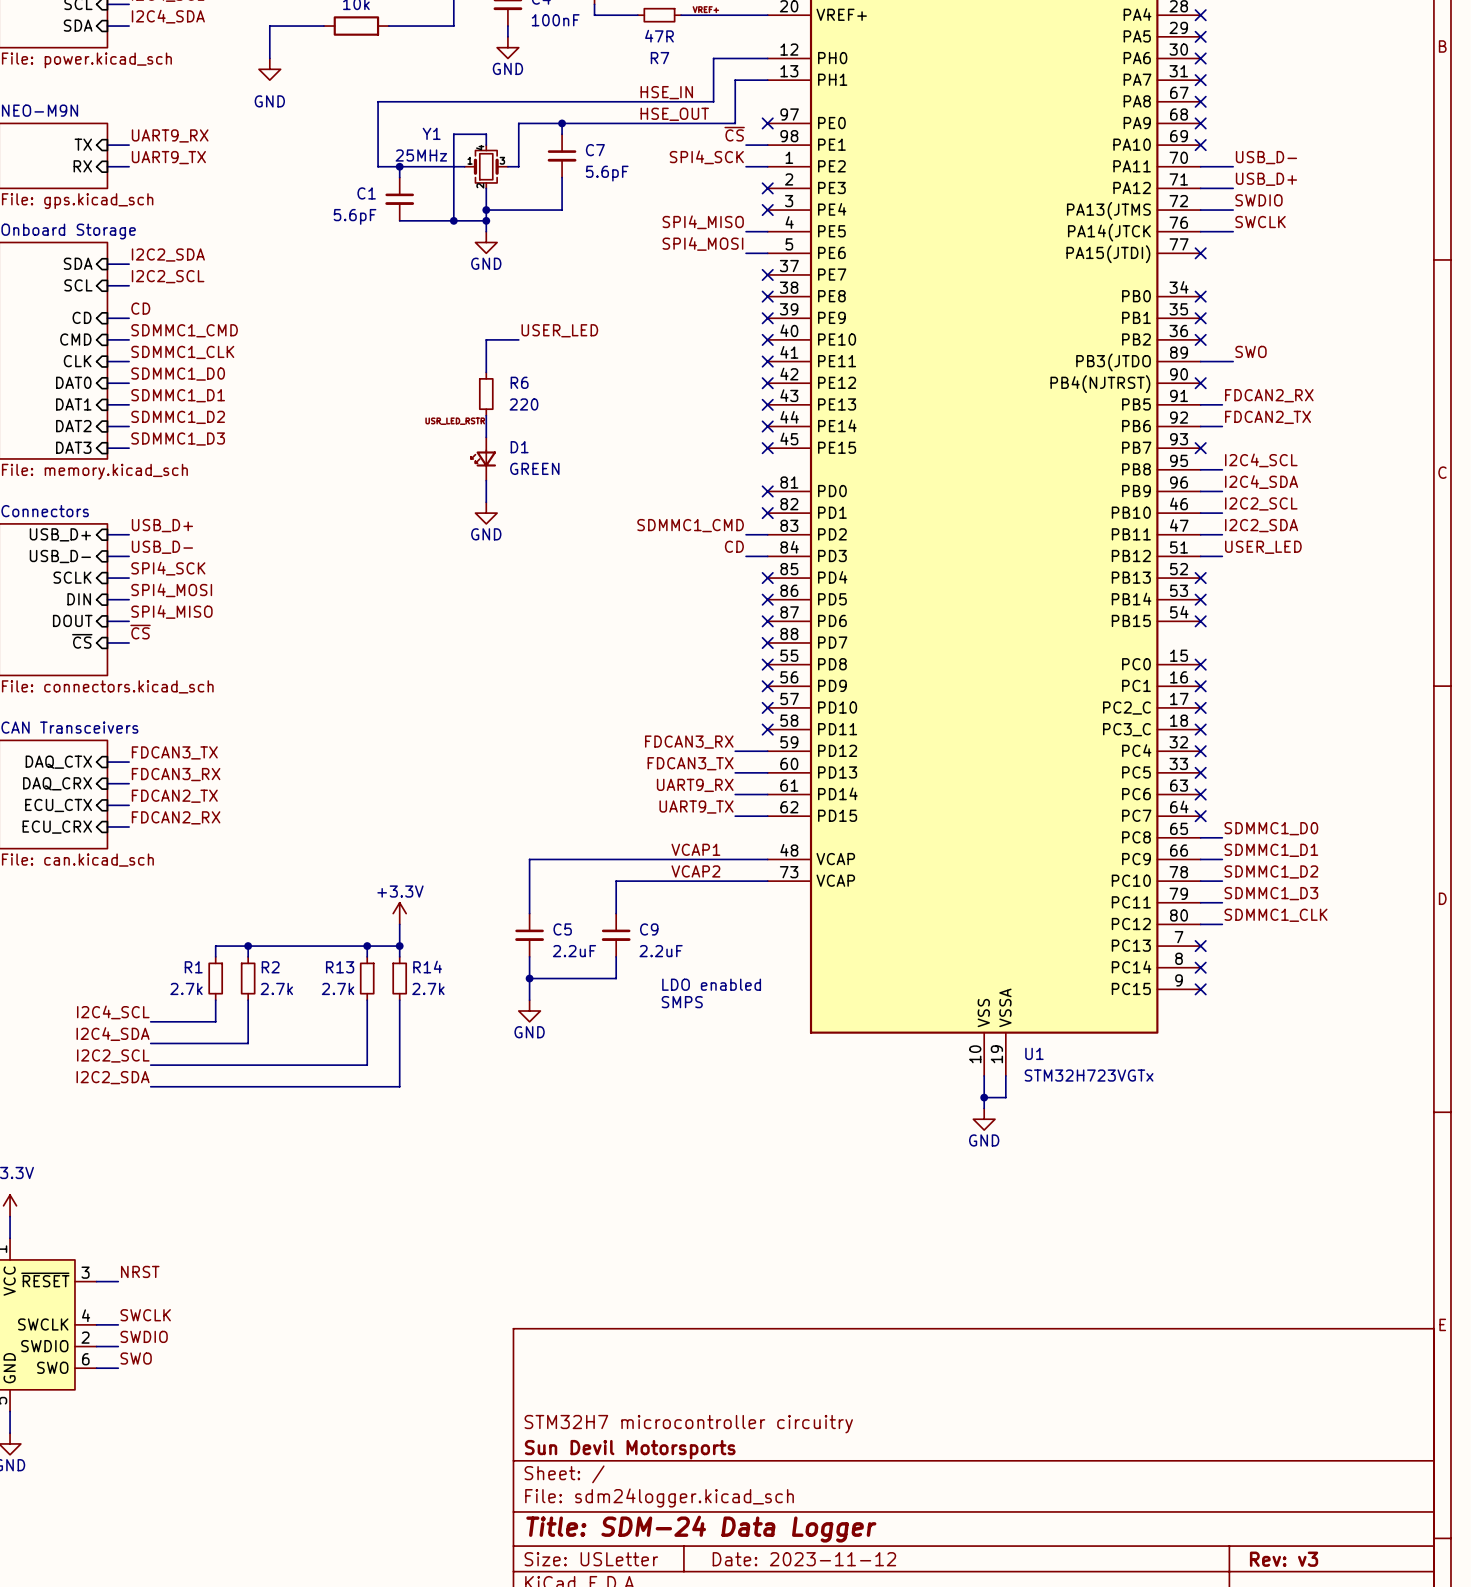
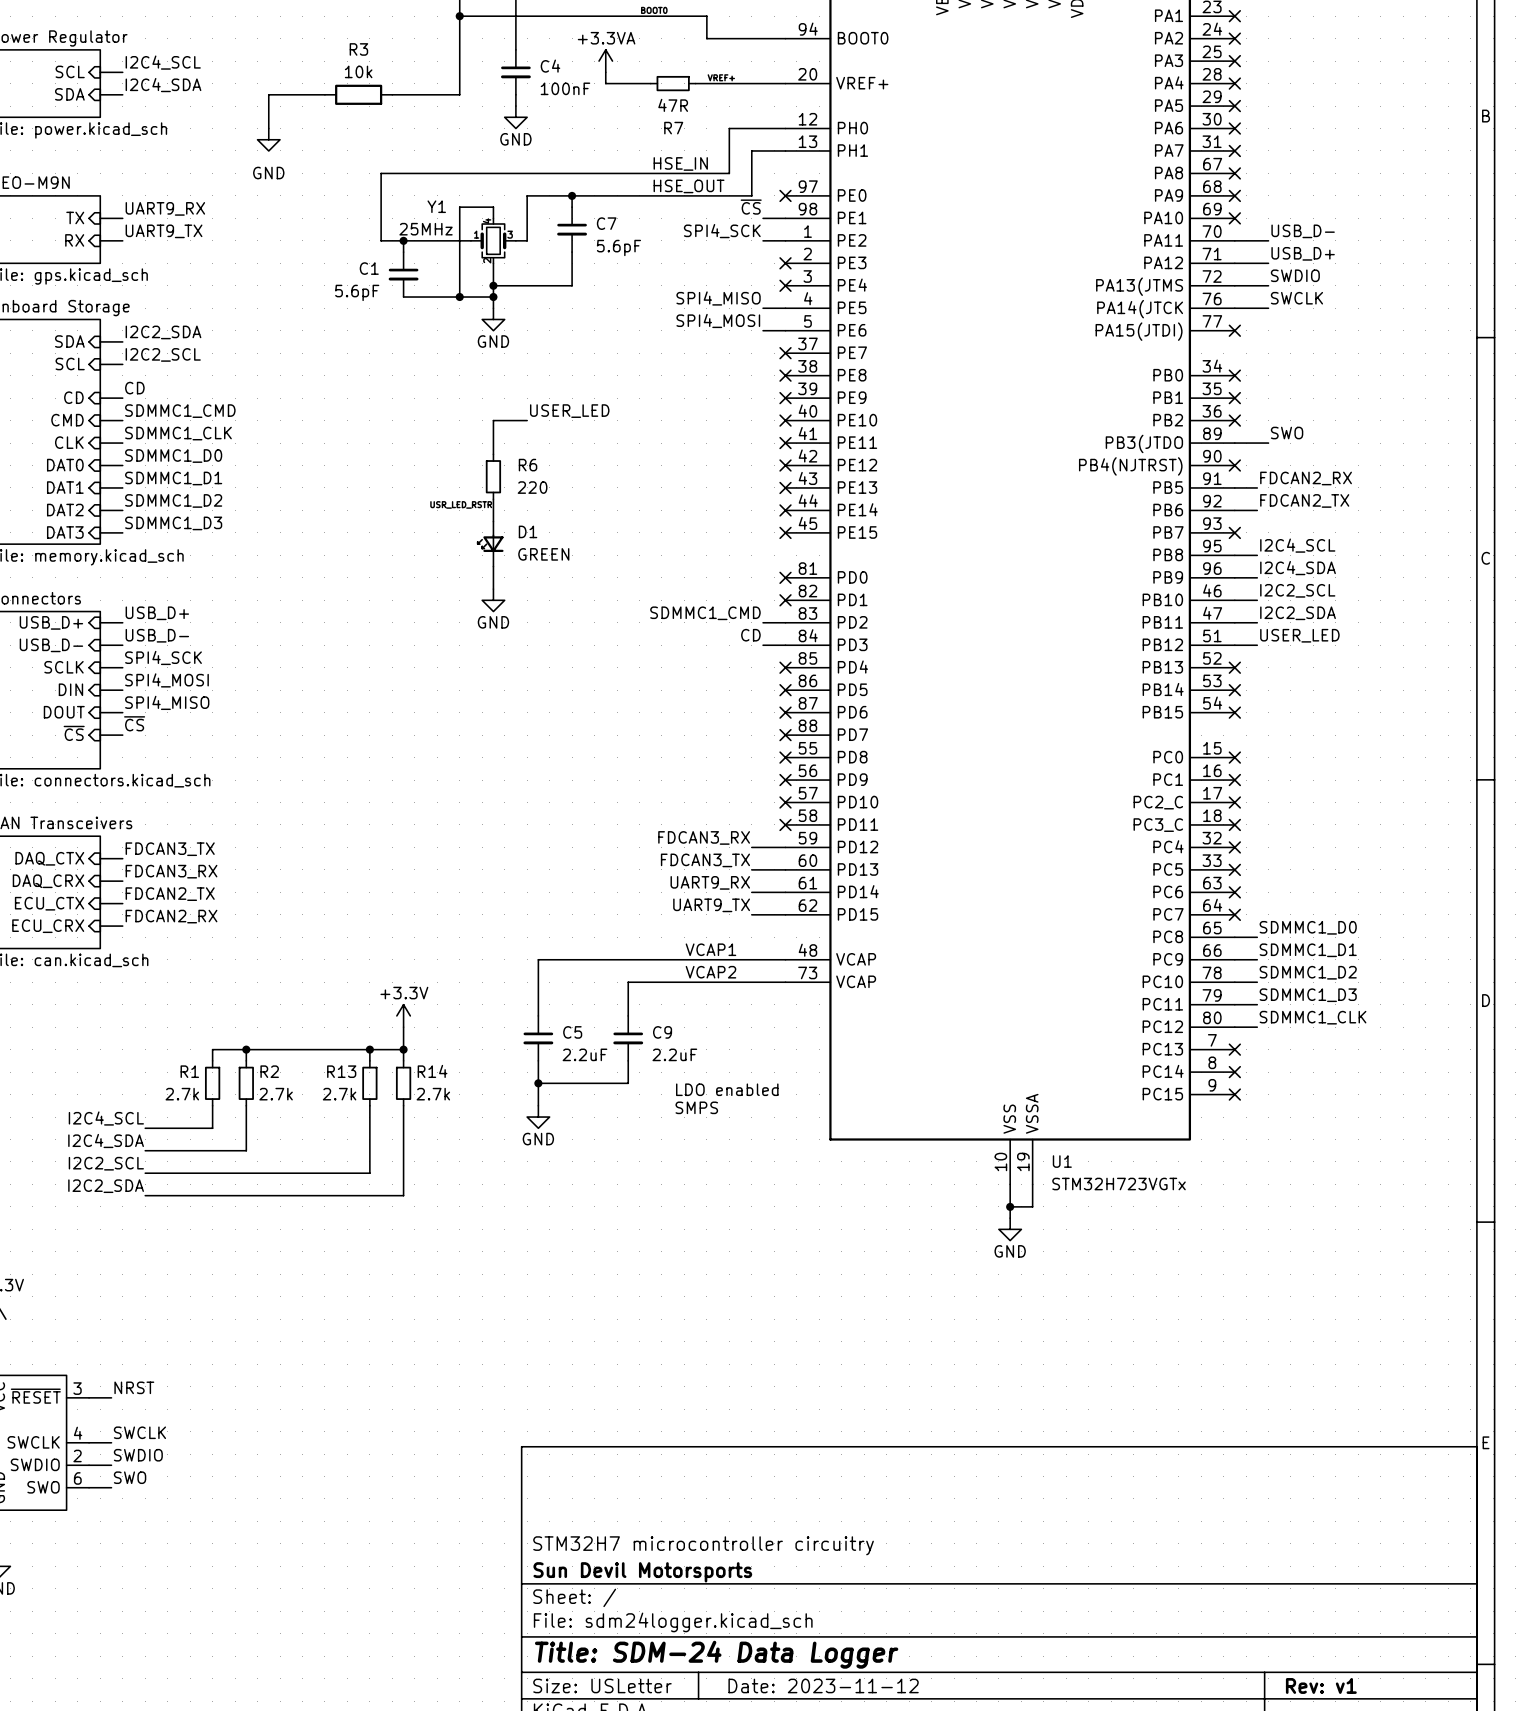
title block: Rev: v3 (1284, 1559) -> Rev: v1 (1321, 1685)

